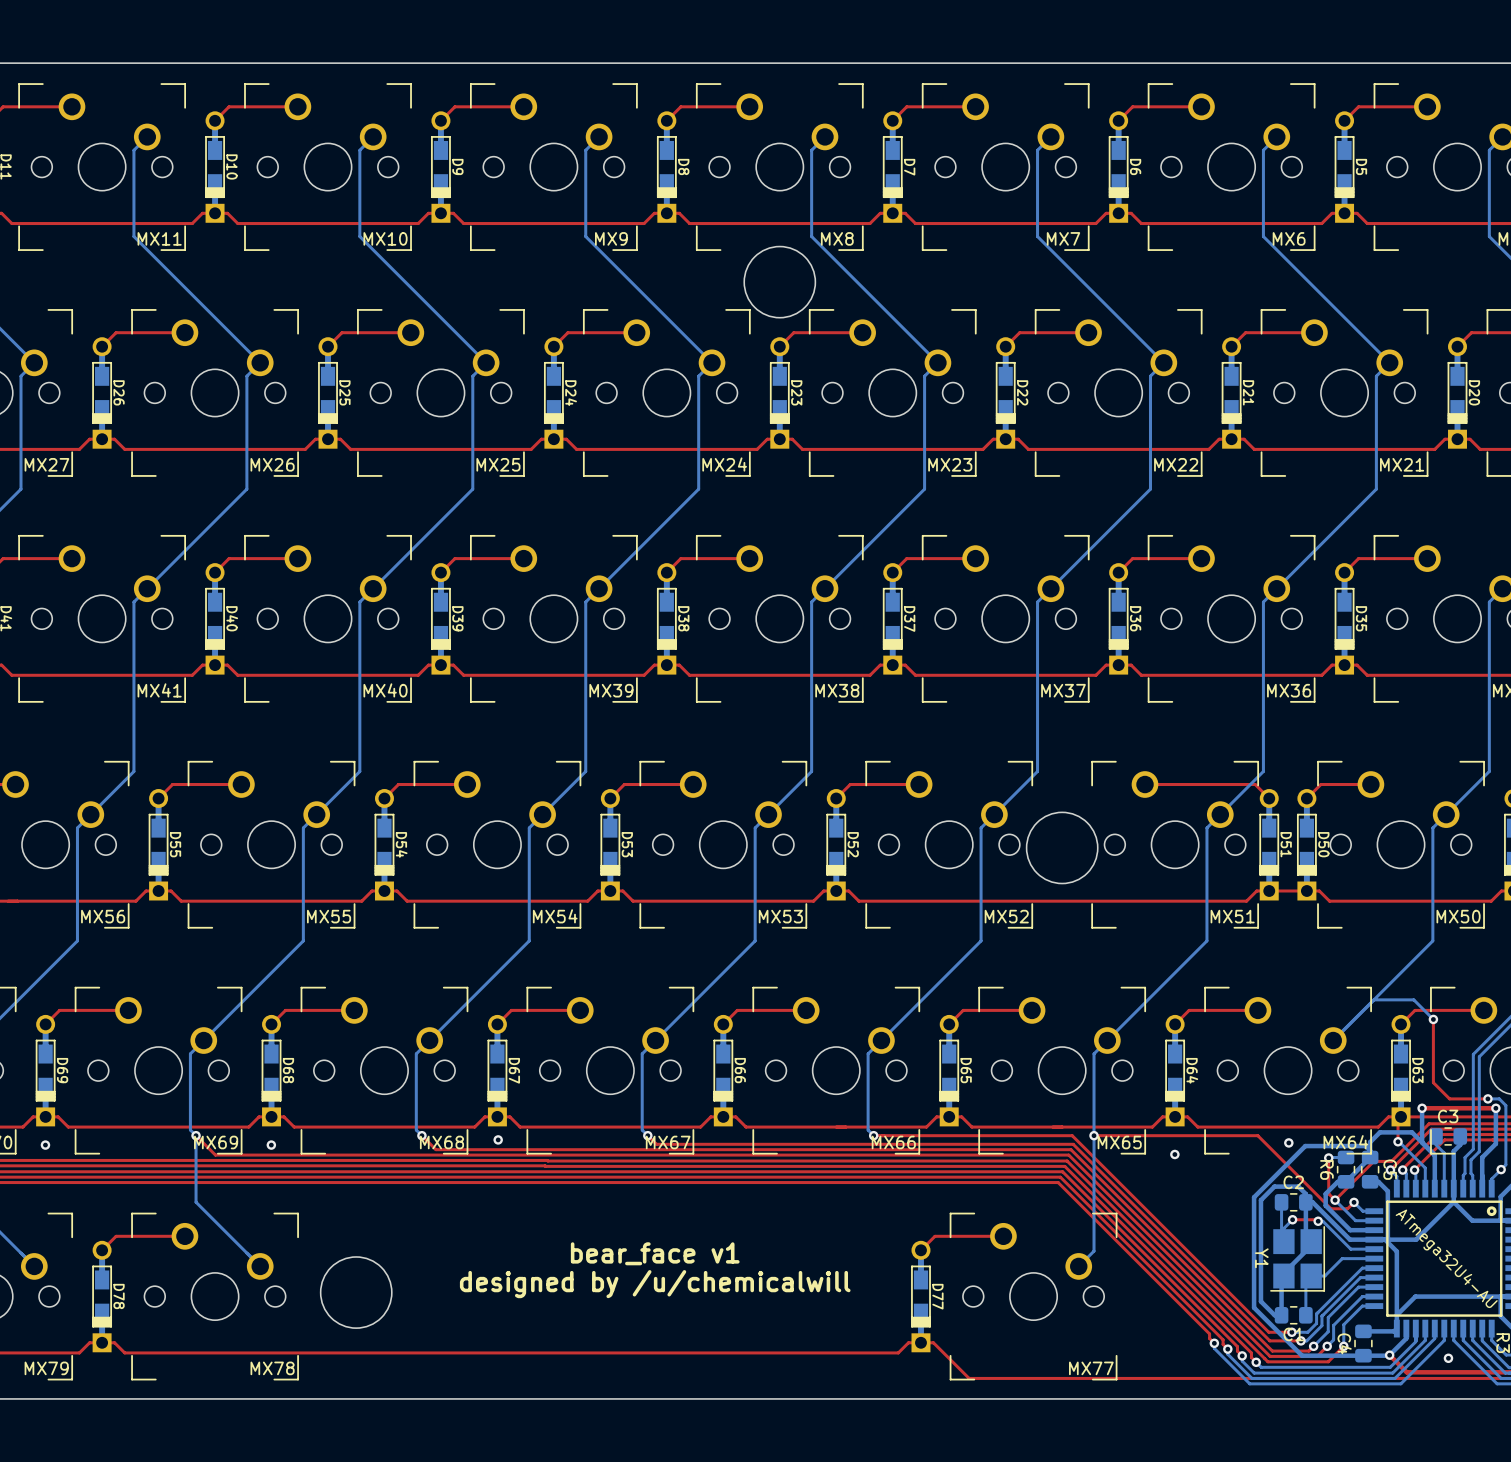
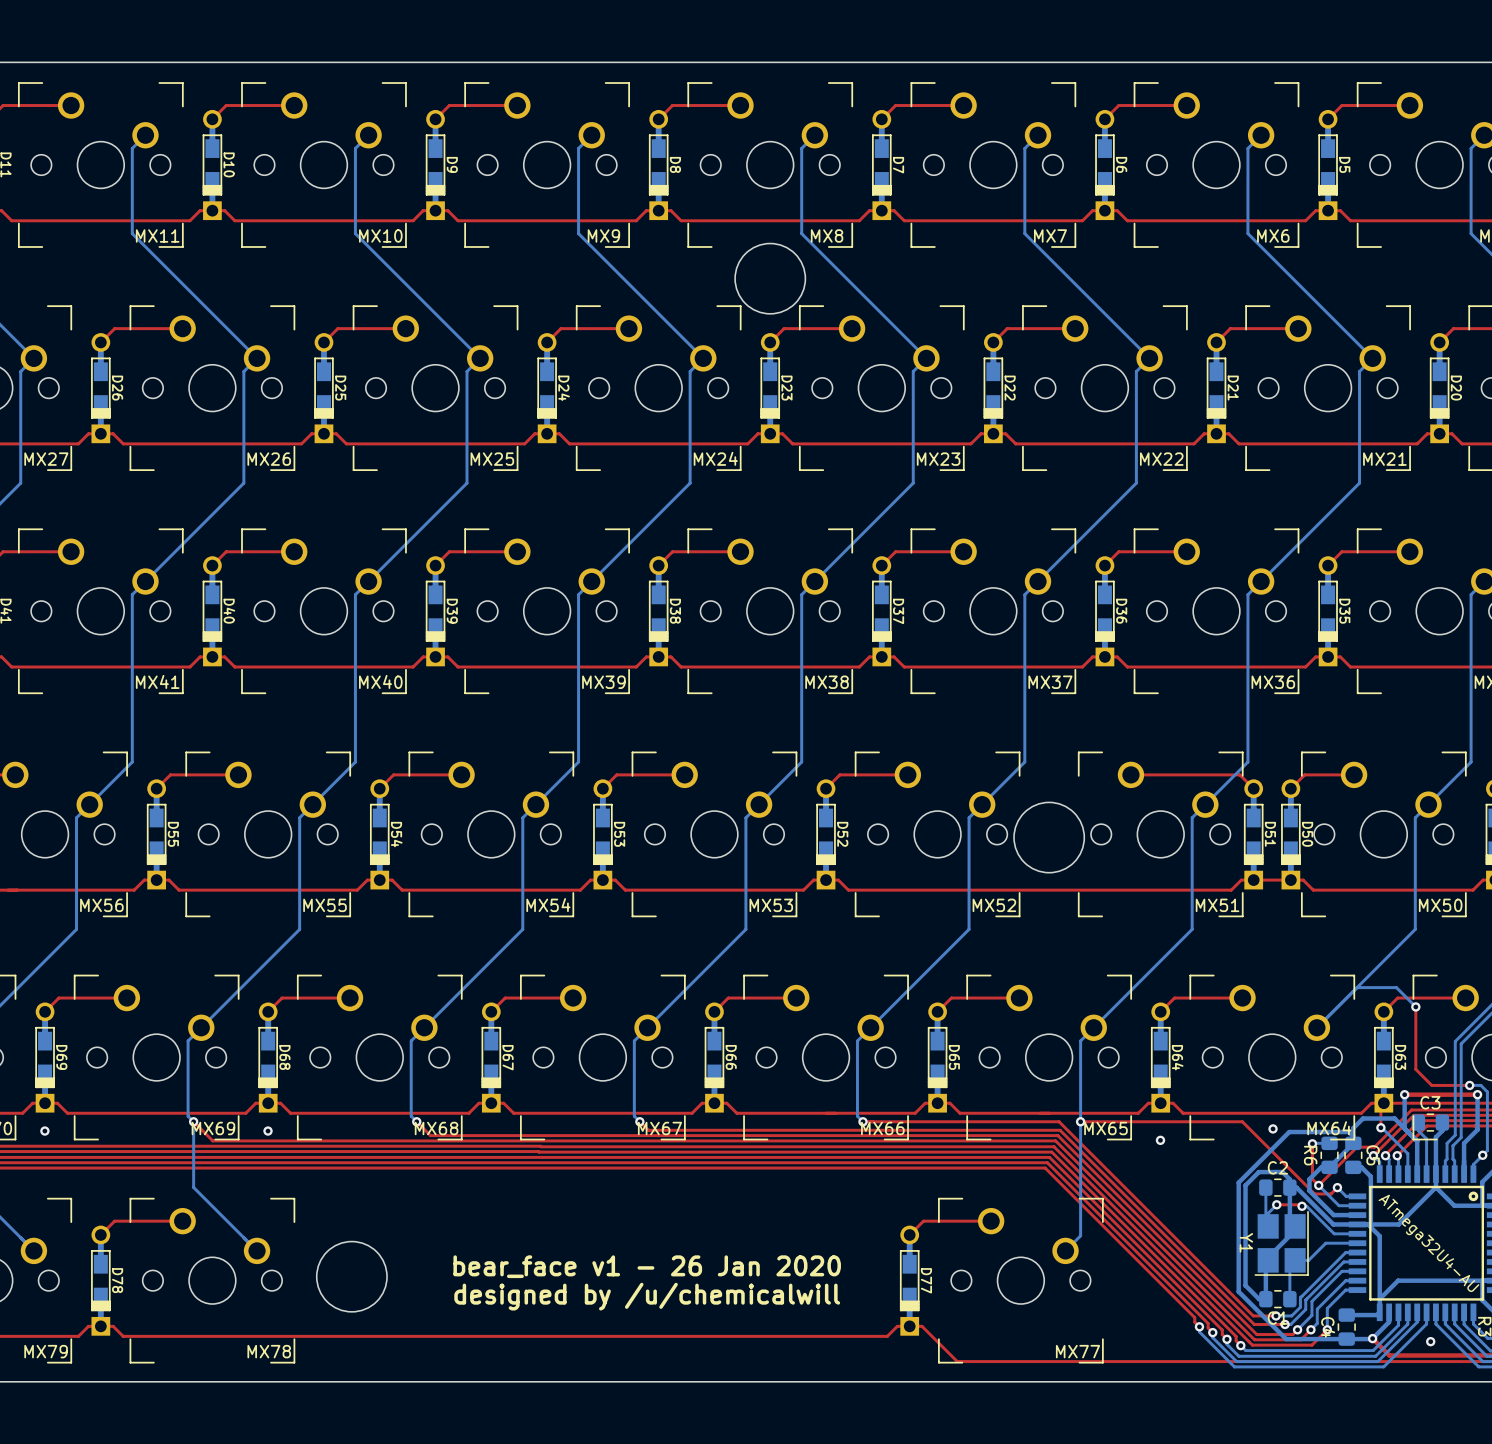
via: (498, 1139) -> none
text: bear_face v1 (655, 1253) -> none
text: designed by /u/chemicalwill (655, 1284) -> bear_face v1 - 26 Jan 2020 (647, 1266)
text: none -> designed by /u/chemicalwill (647, 1296)

